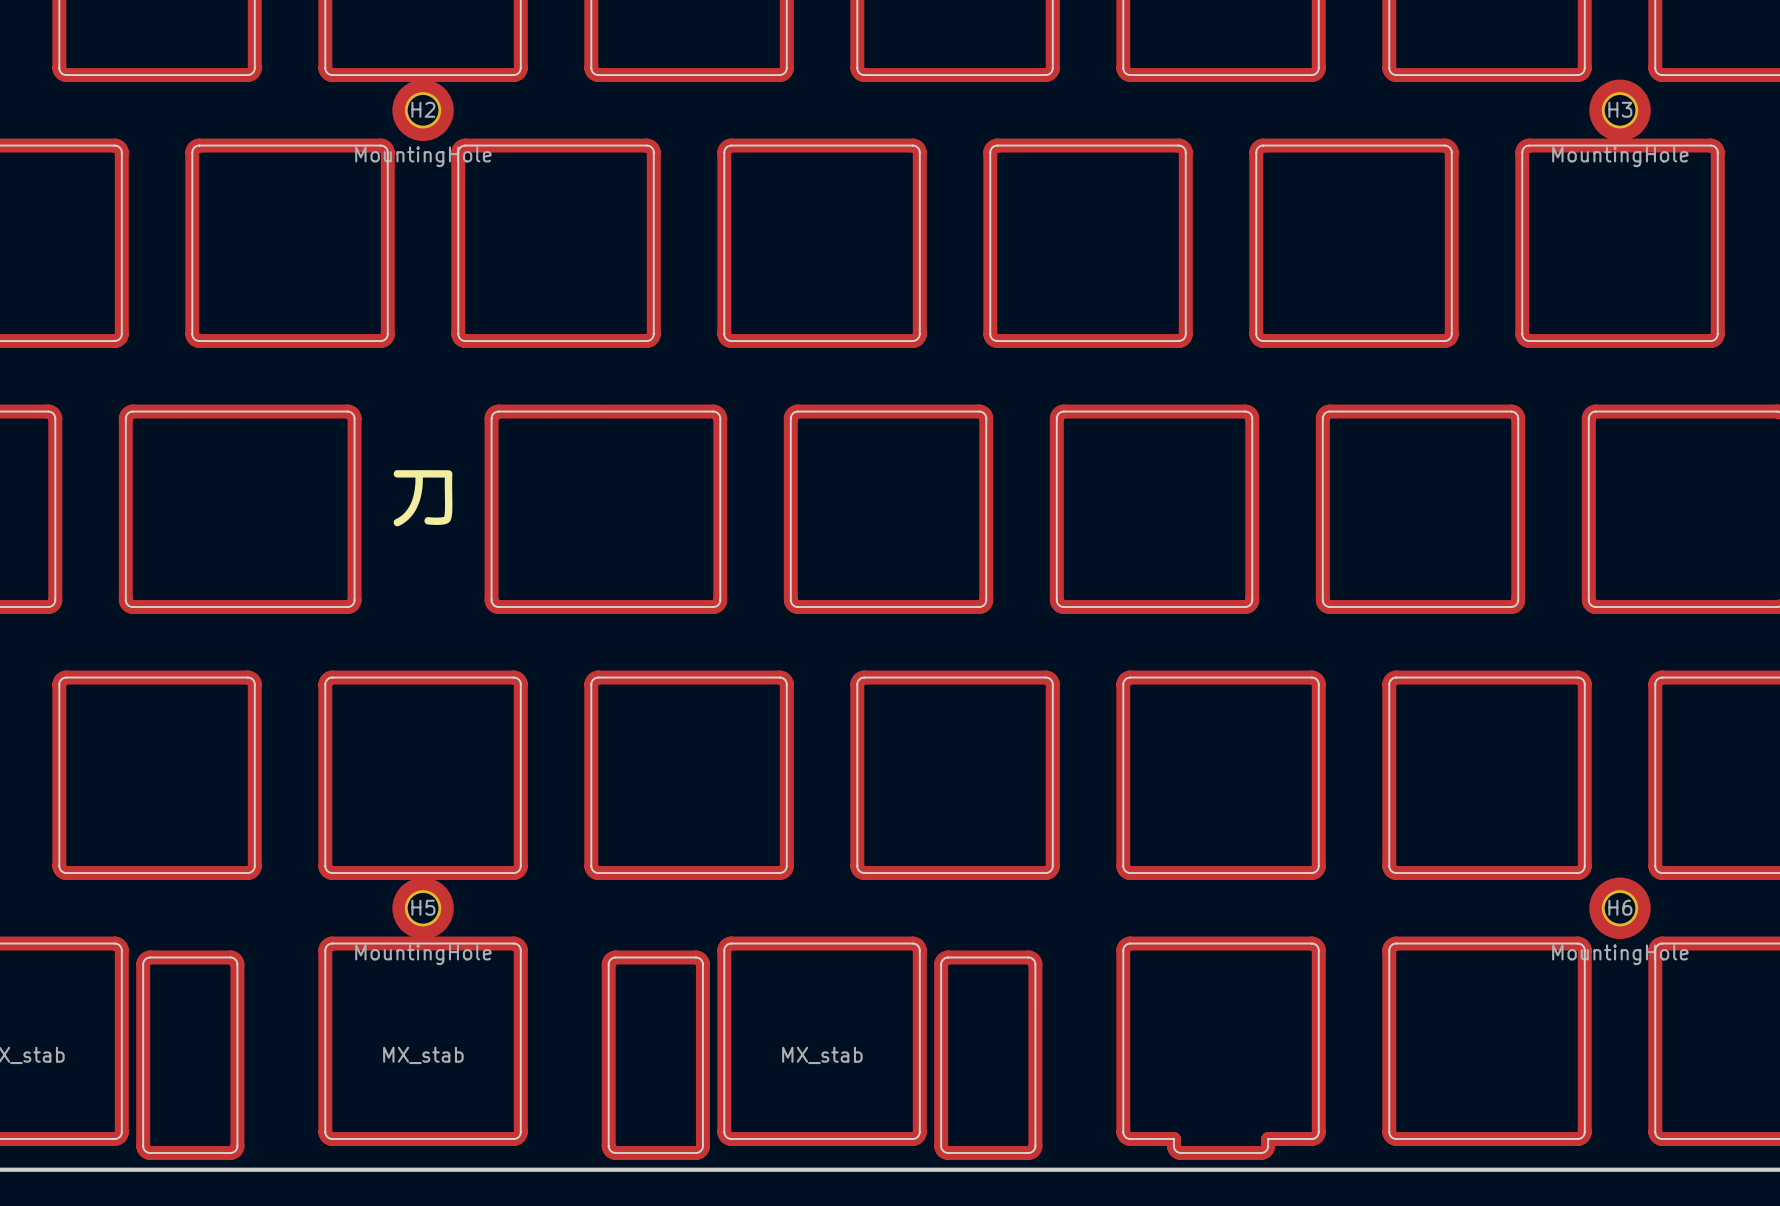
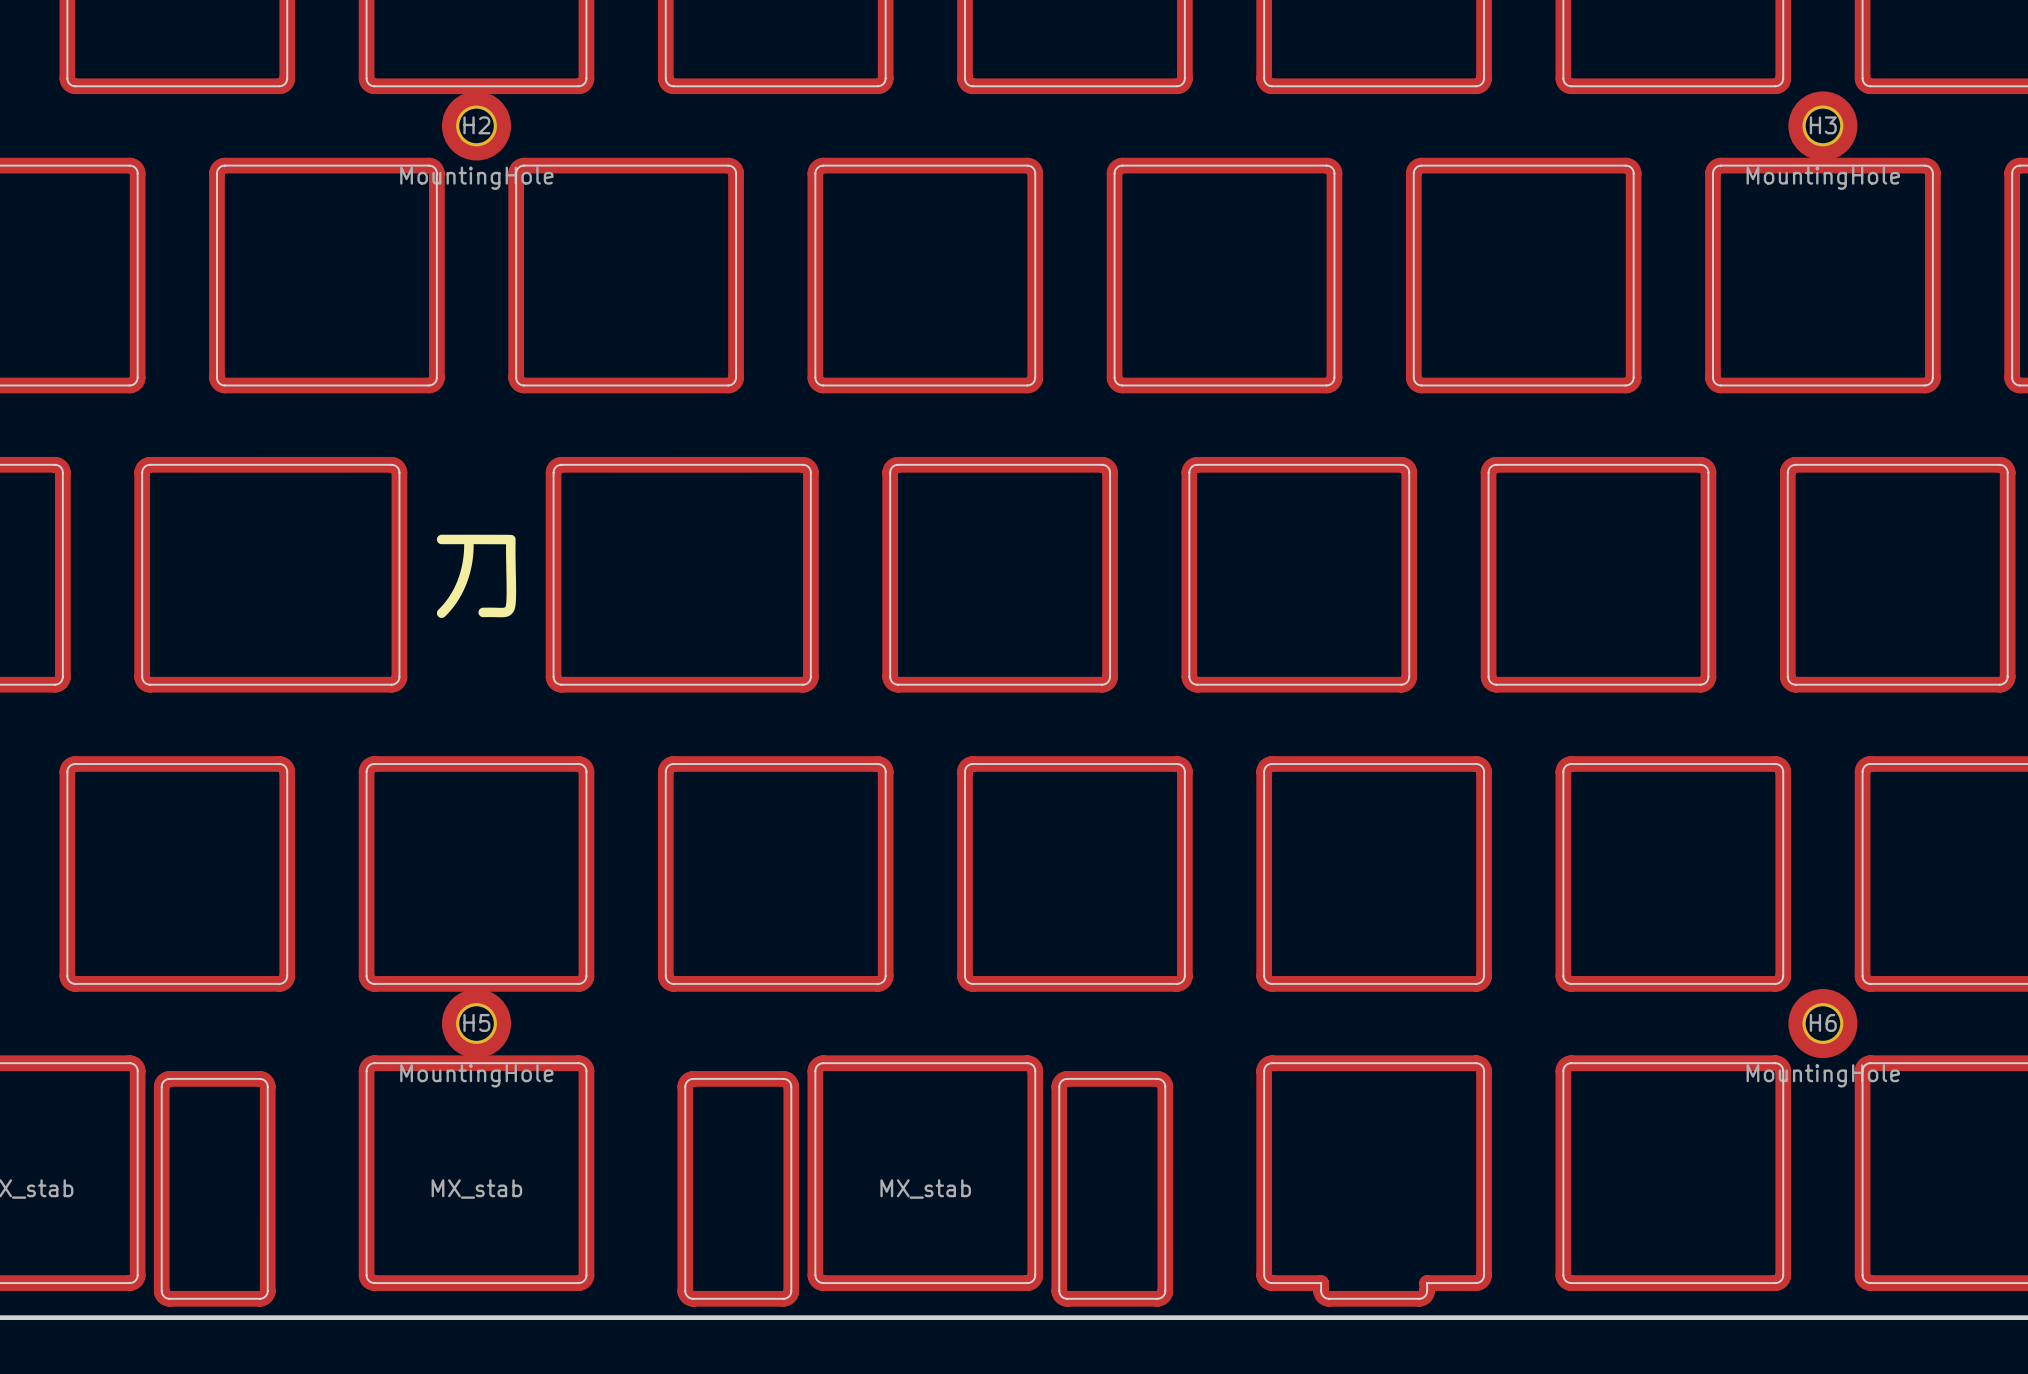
drawing shape: [393, 470, 453, 527] -> [436, 534, 517, 618]

